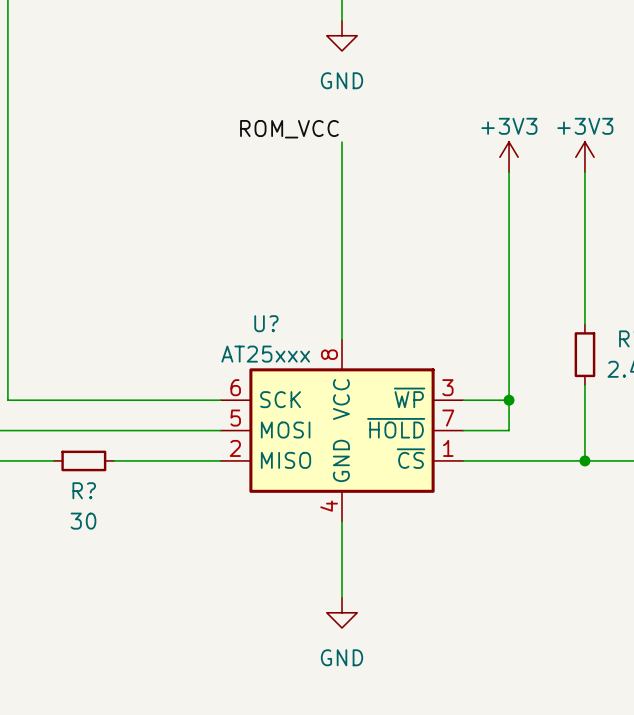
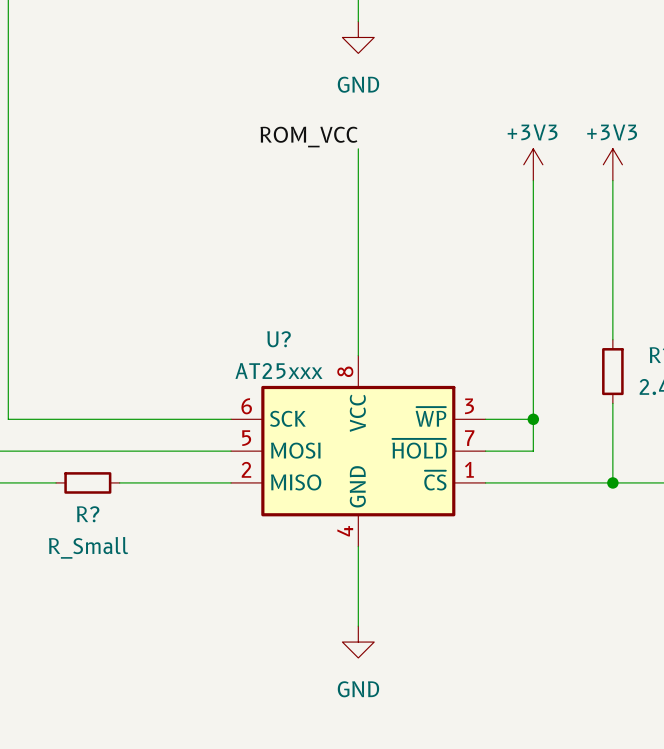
R? value: 30 (83, 521) -> R_Small (88, 547)

